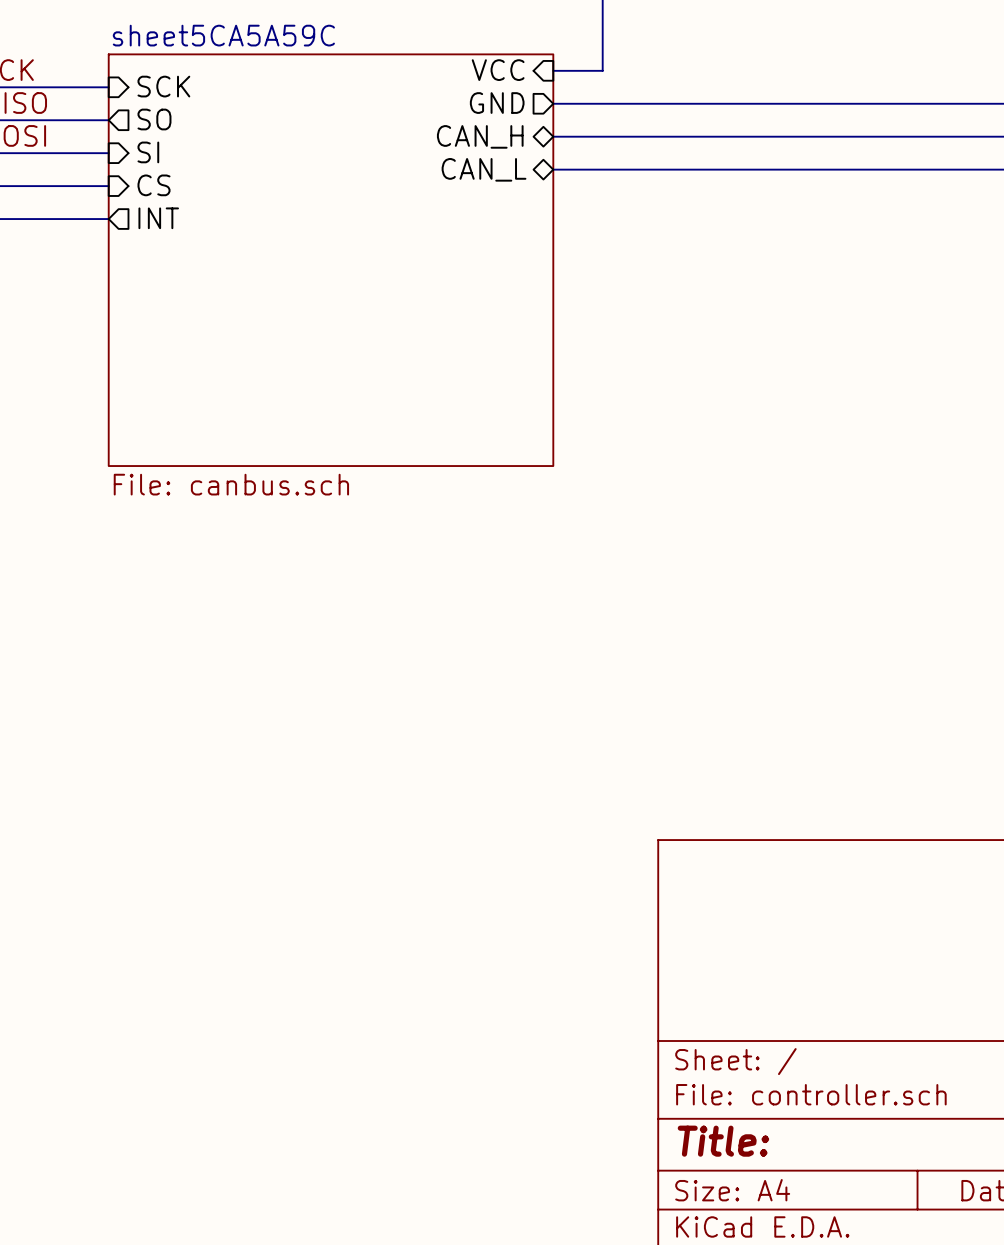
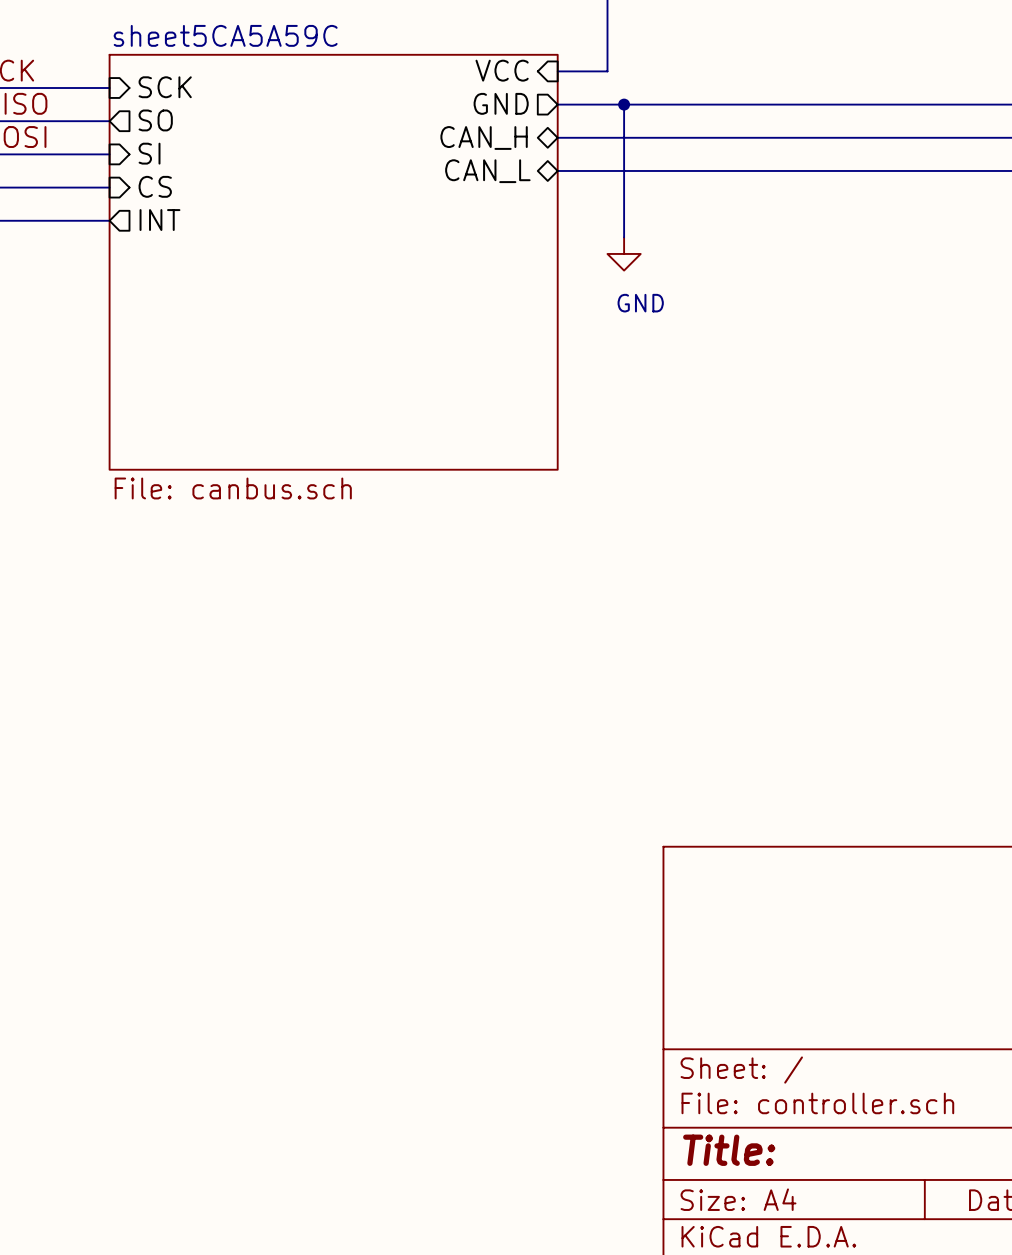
wire: none -> (624, 104) (624, 237)
junction: none -> (624, 104)
power symbol: none -> GND (624, 253)

